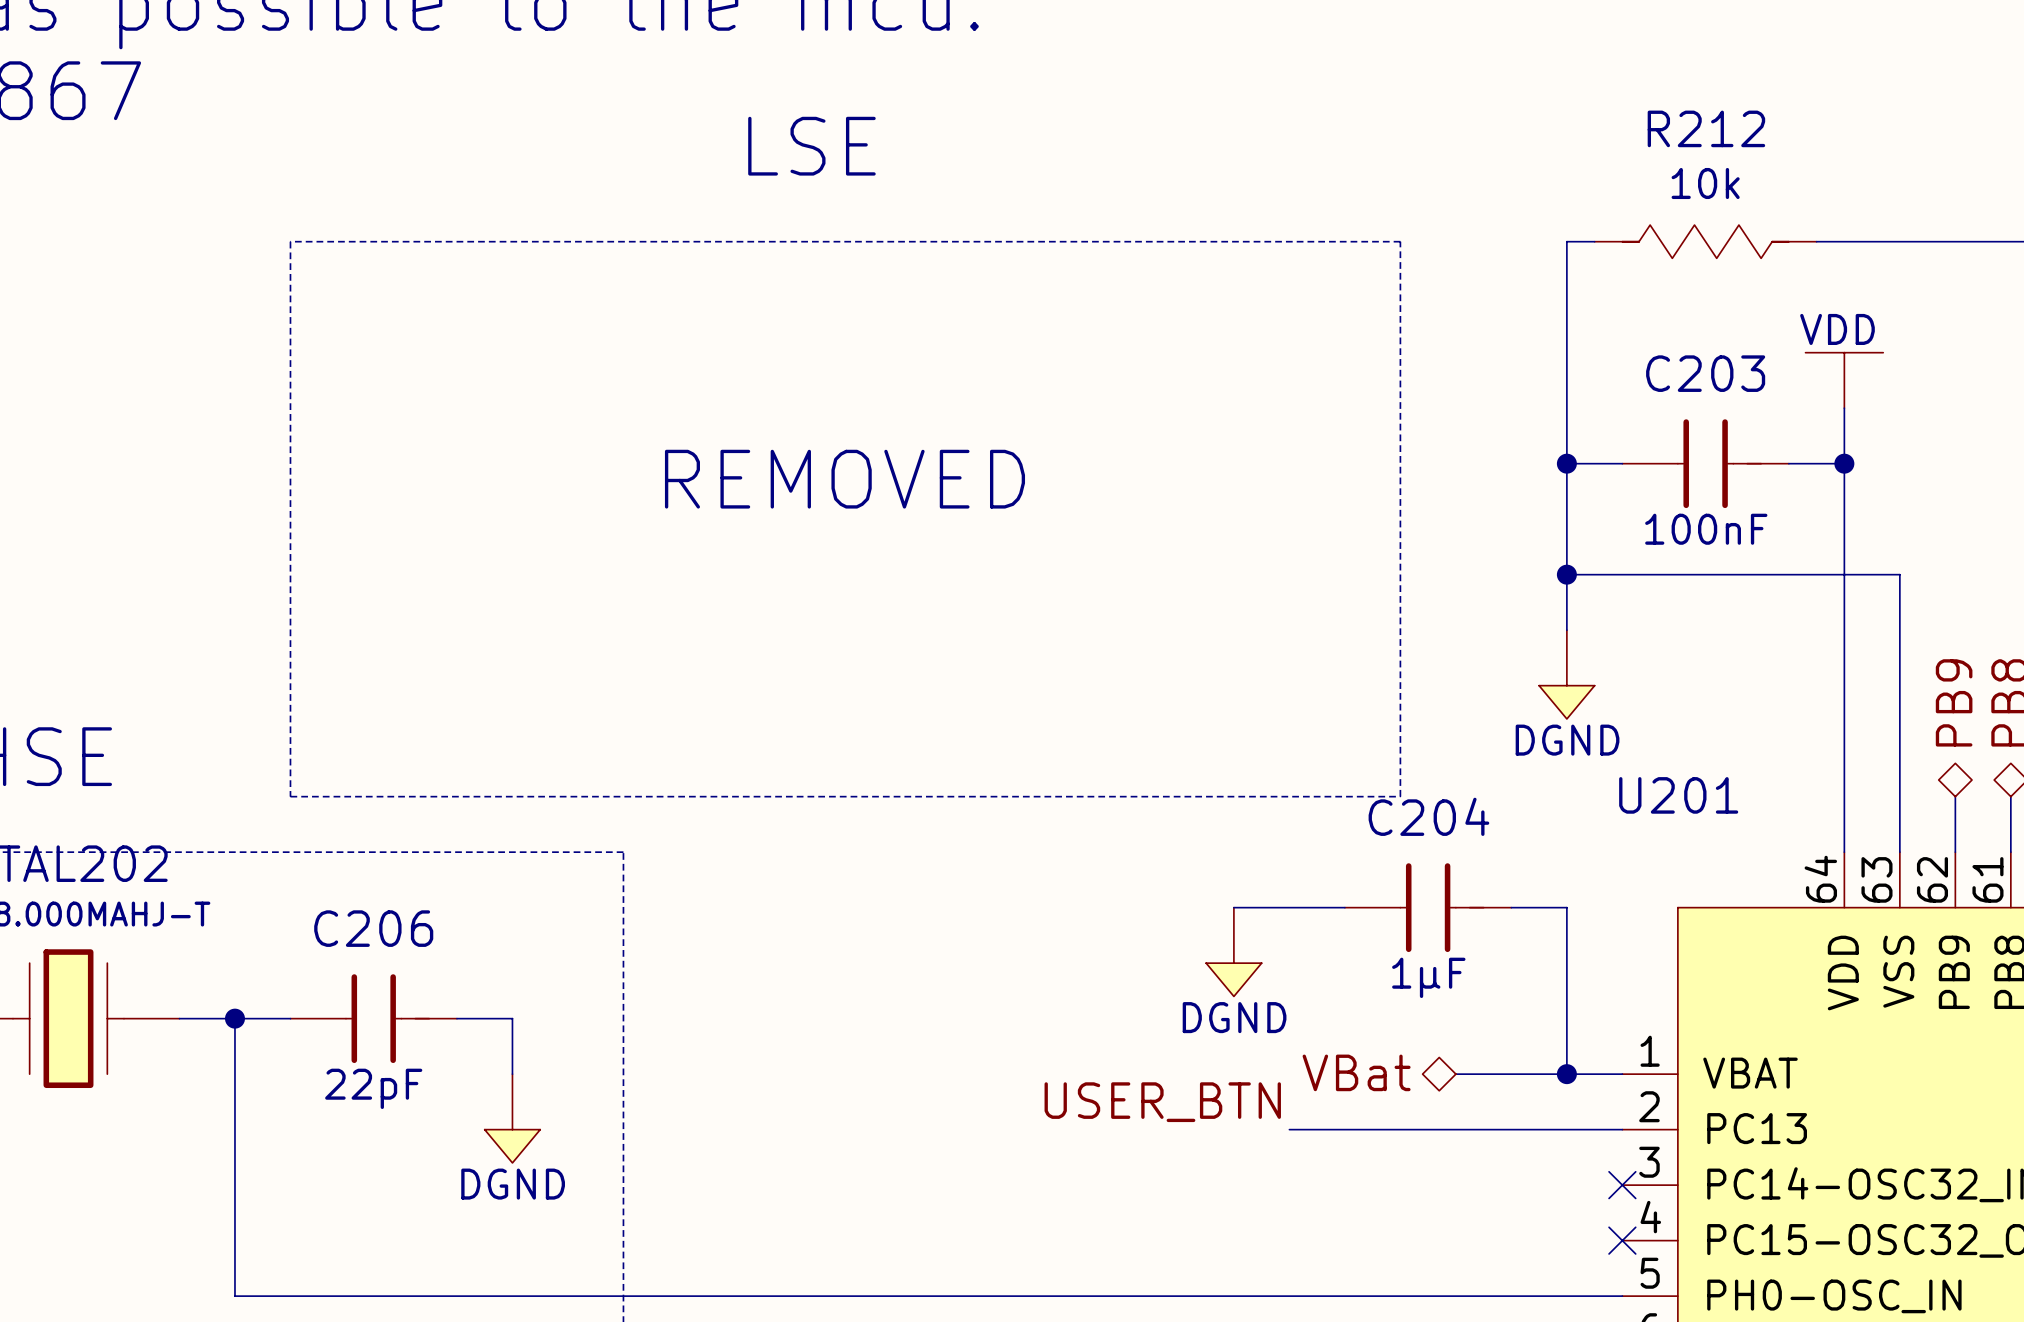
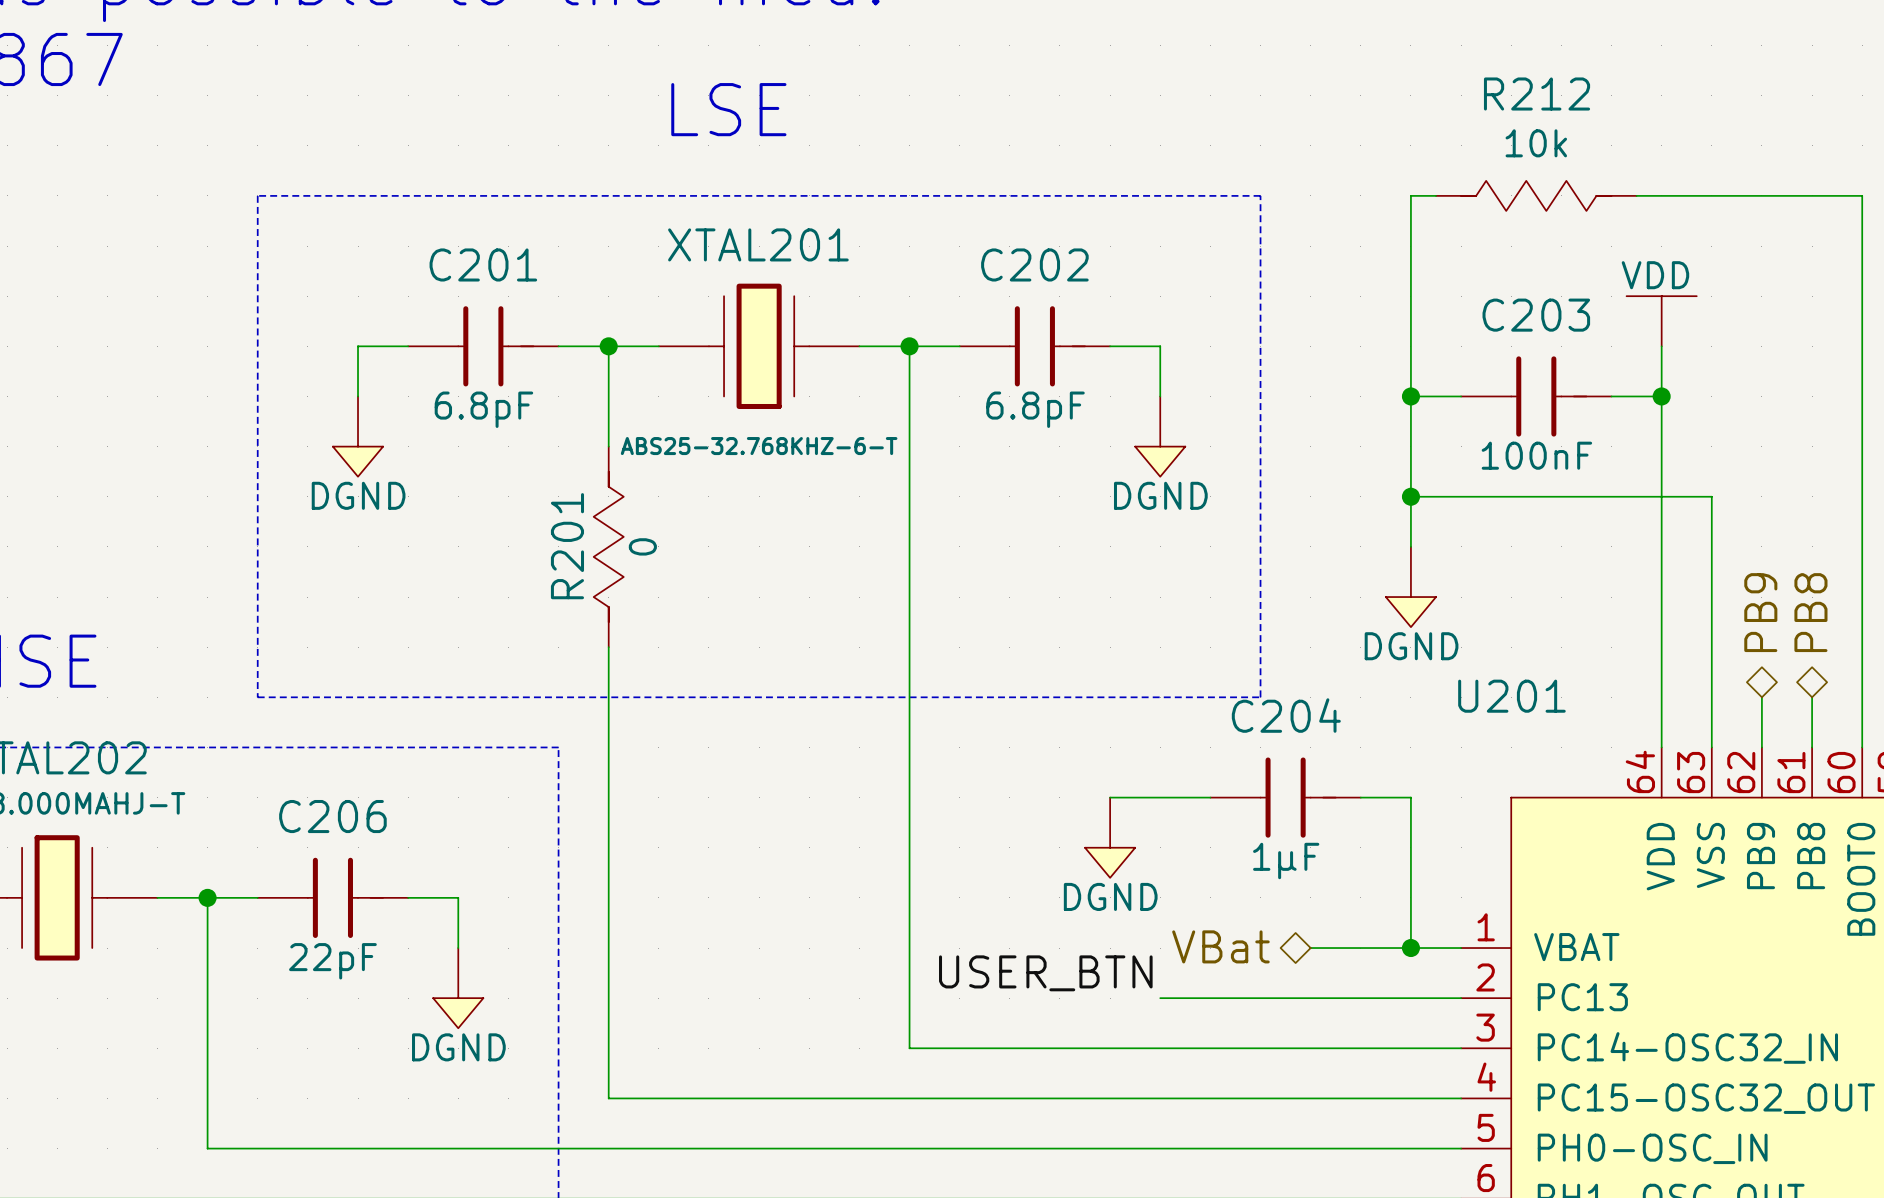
wire: none -> (408, 346) (358, 346) (358, 396)
C201: none -> (483, 346)
wire: none -> (558, 346) (658, 346)
wire: none -> (608, 346) (608, 446)
junction: none -> (608, 346)
XTAL201: none -> ABS25-32.768KHZ-6-T (759, 346)
wire: none -> (859, 346) (959, 346)
wire: none -> (909, 346) (909, 1048) (1461, 1048)
junction: none -> (909, 346)
C202: none -> (1034, 346)
wire: none -> (1110, 346) (1160, 346) (1160, 396)
text: REMOVED (844, 479) -> none
power symbol: none -> DGND (358, 436)
power symbol: none -> DGND (1160, 436)
R201: none -> (608, 546)
wire: none -> (608, 647) (608, 1098) (1461, 1098)
no-connect mark: (1622, 1185) -> none
no-connect mark: (1622, 1240) -> none

